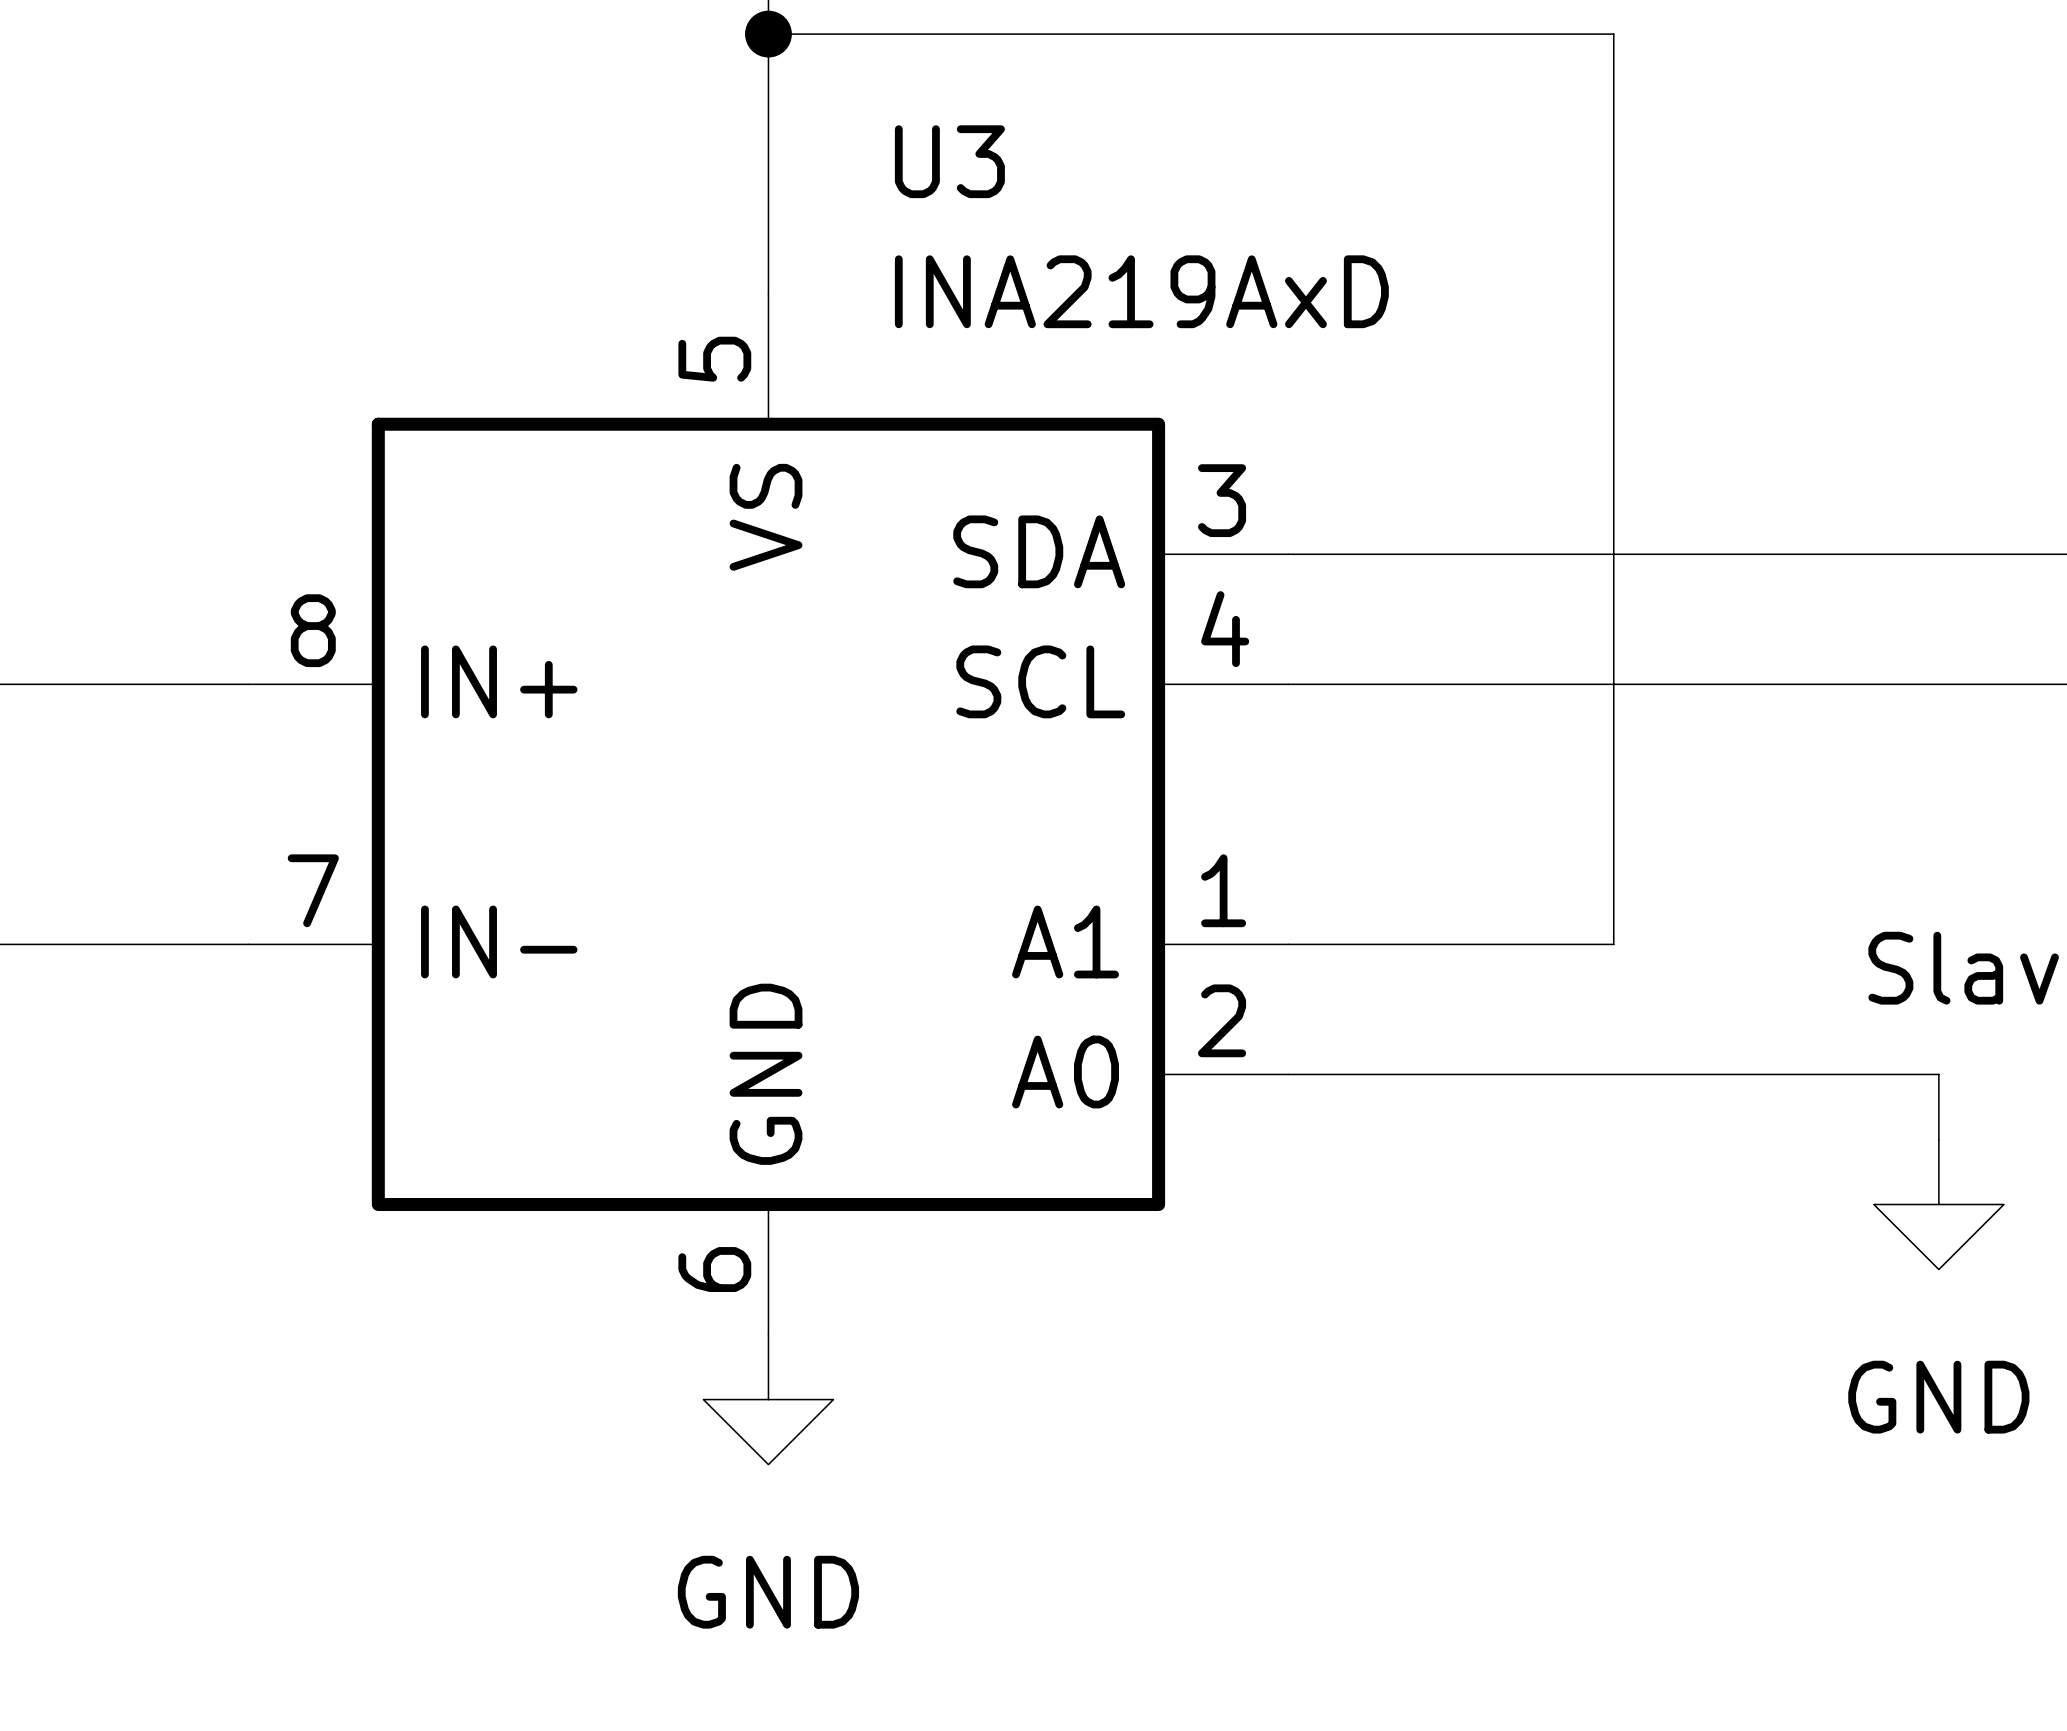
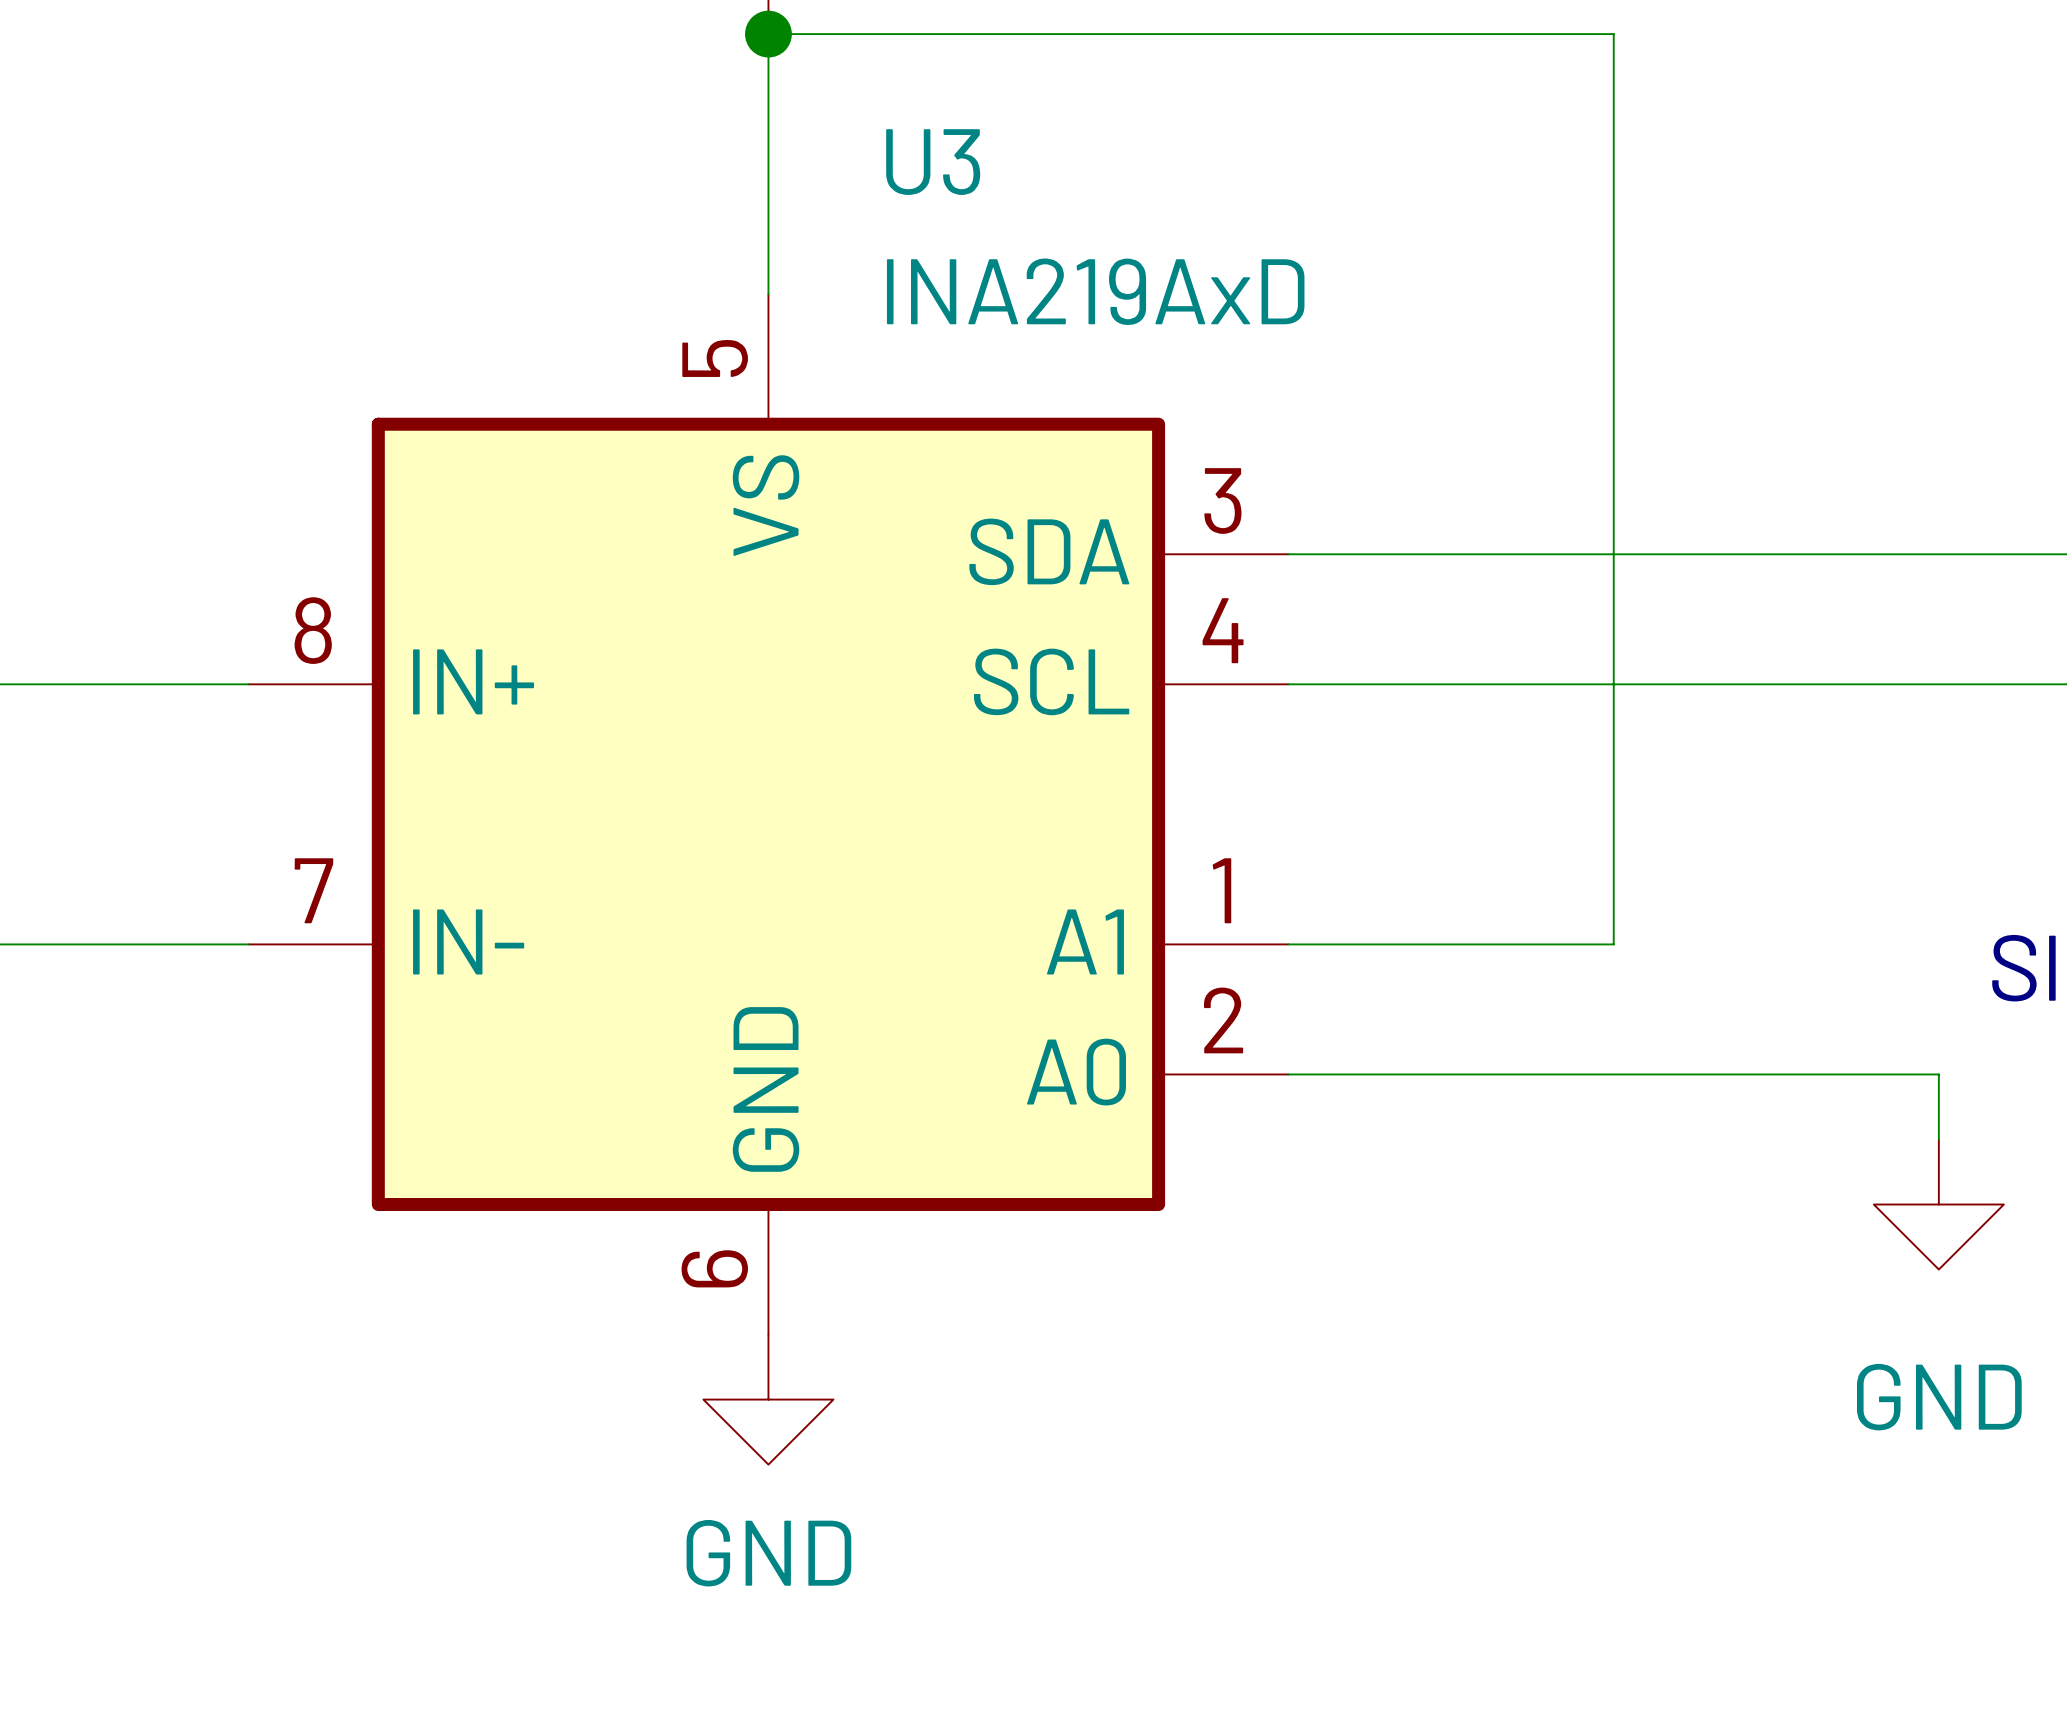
power symbol text position: GND (768, 1592) -> GND (768, 1553)

